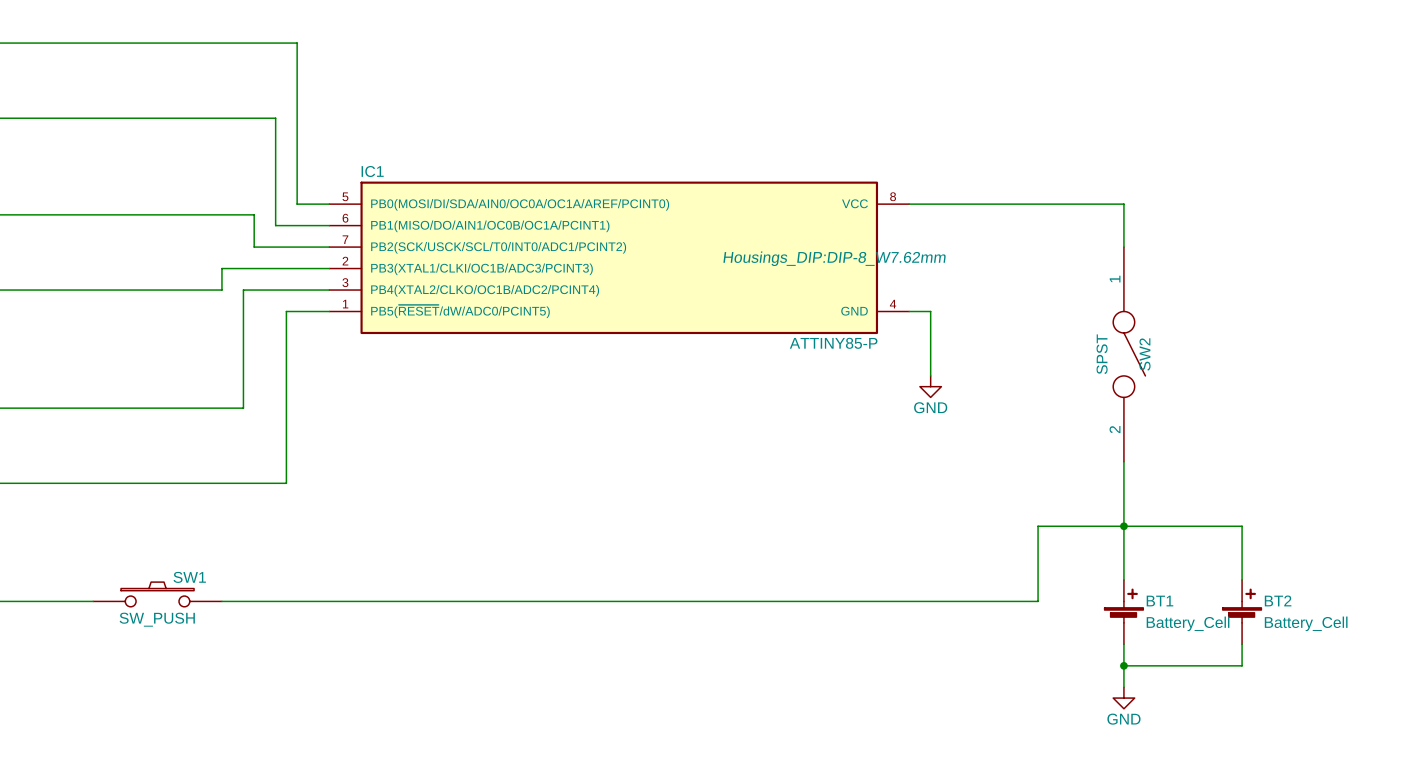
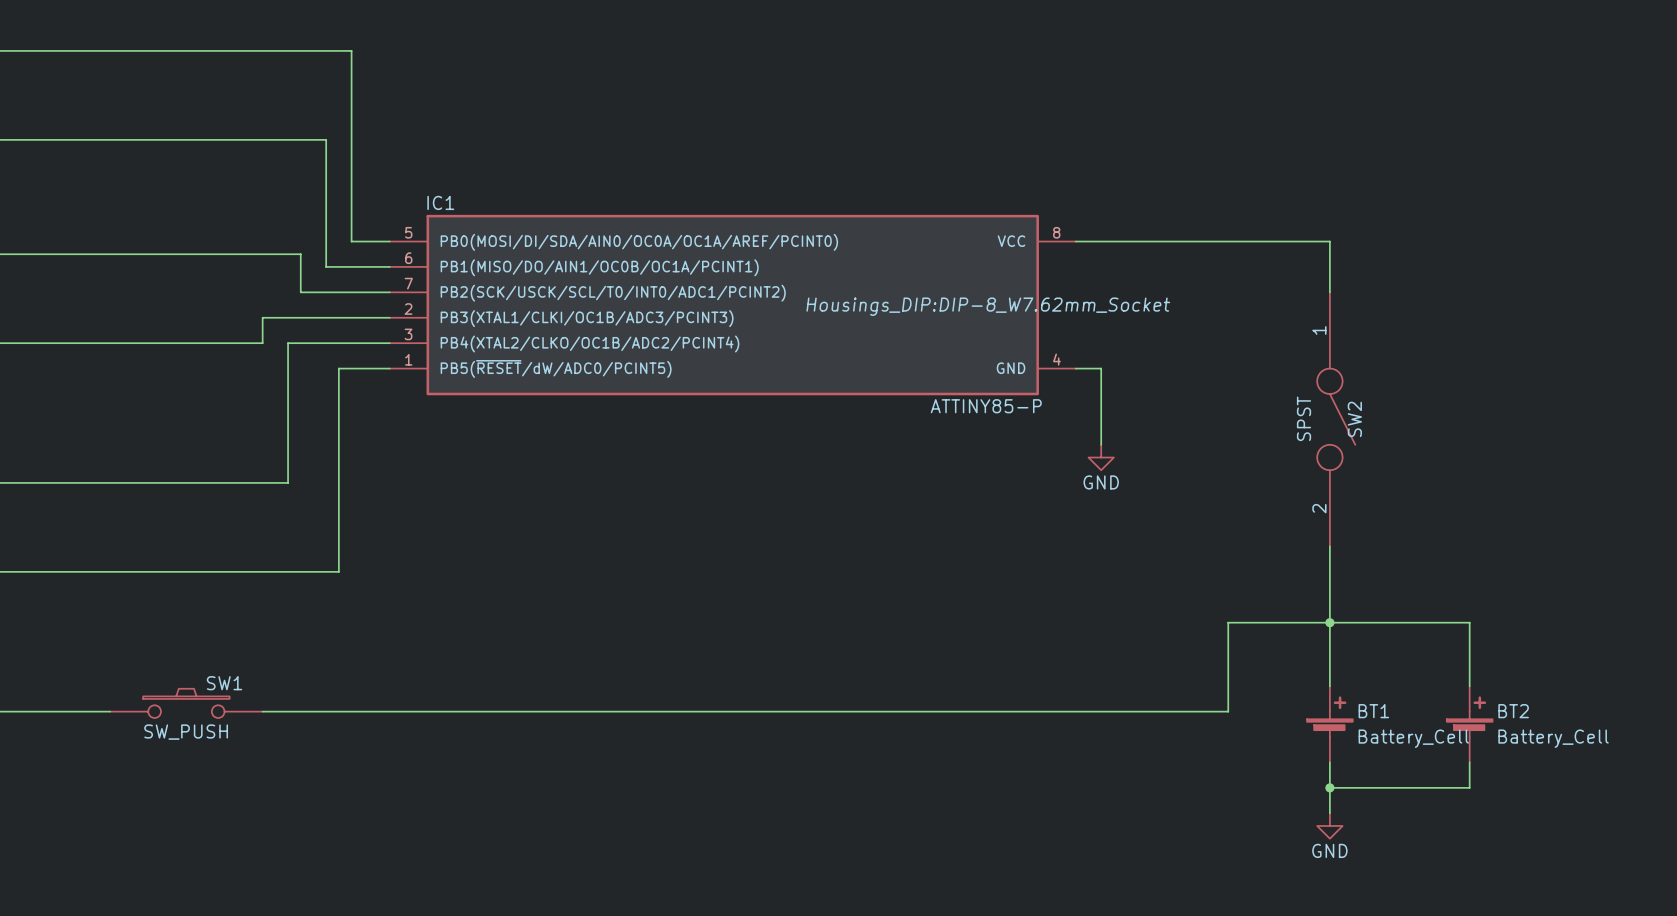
IC1 text: Housings_DIP:DIP-8_W7.62mm (834, 258) -> Housings_DIP:DIP-8_W7.62mm_Socket (988, 306)

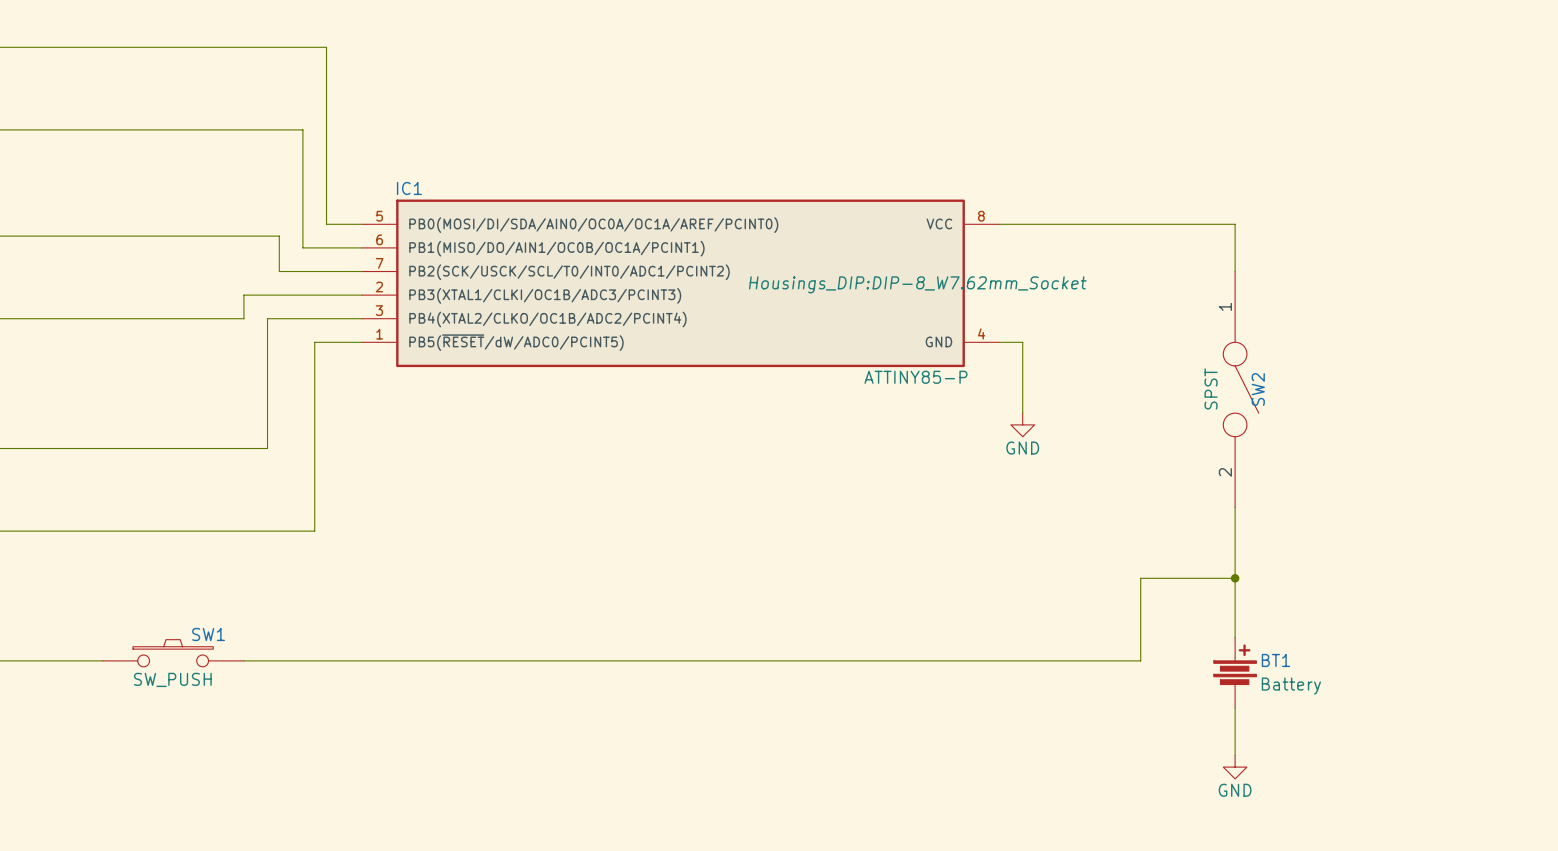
wire: (1329, 622) (1469, 622) (1469, 686) -> none
BT1 symbol: [1307, 686, 1353, 763] -> [1213, 637, 1257, 709]
BT2: Battery_Cell (1469, 724) -> none
BT1 value: Battery_Cell (1413, 738) -> Battery (1291, 686)
wire: (1469, 762) (1469, 787) (1329, 787) -> none
junction: (1329, 787) -> none

